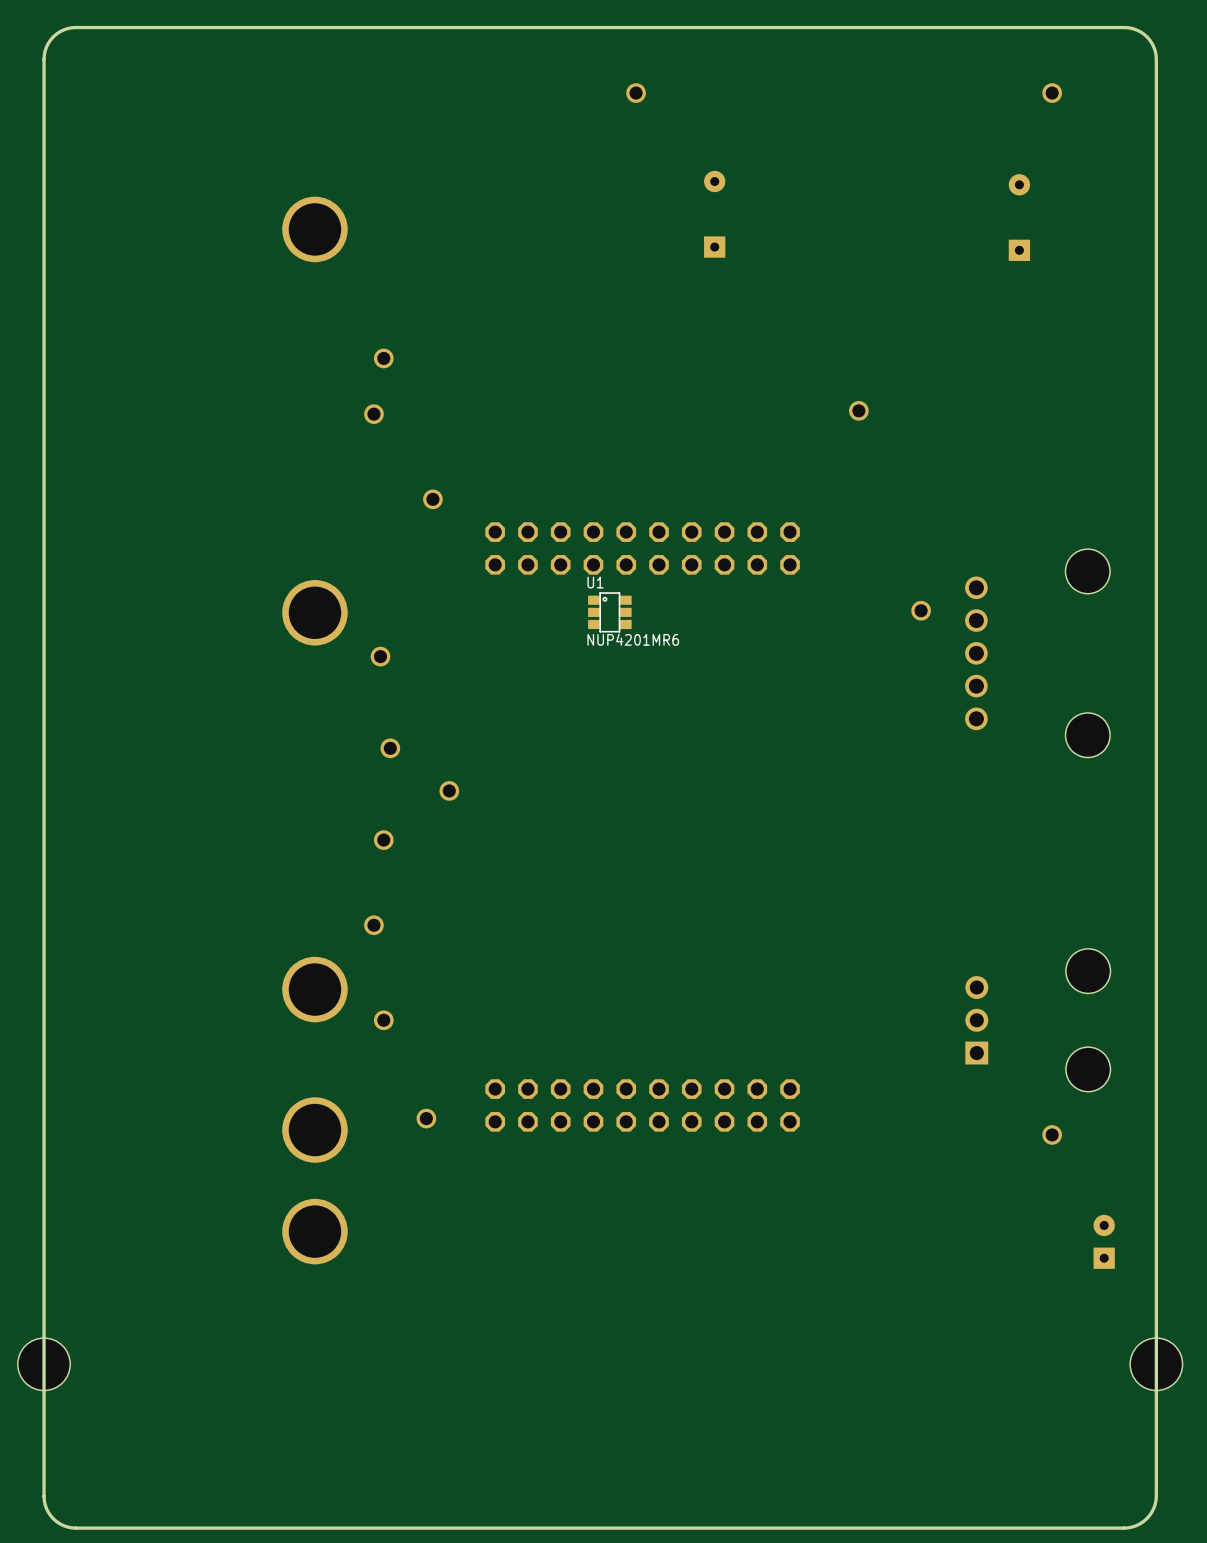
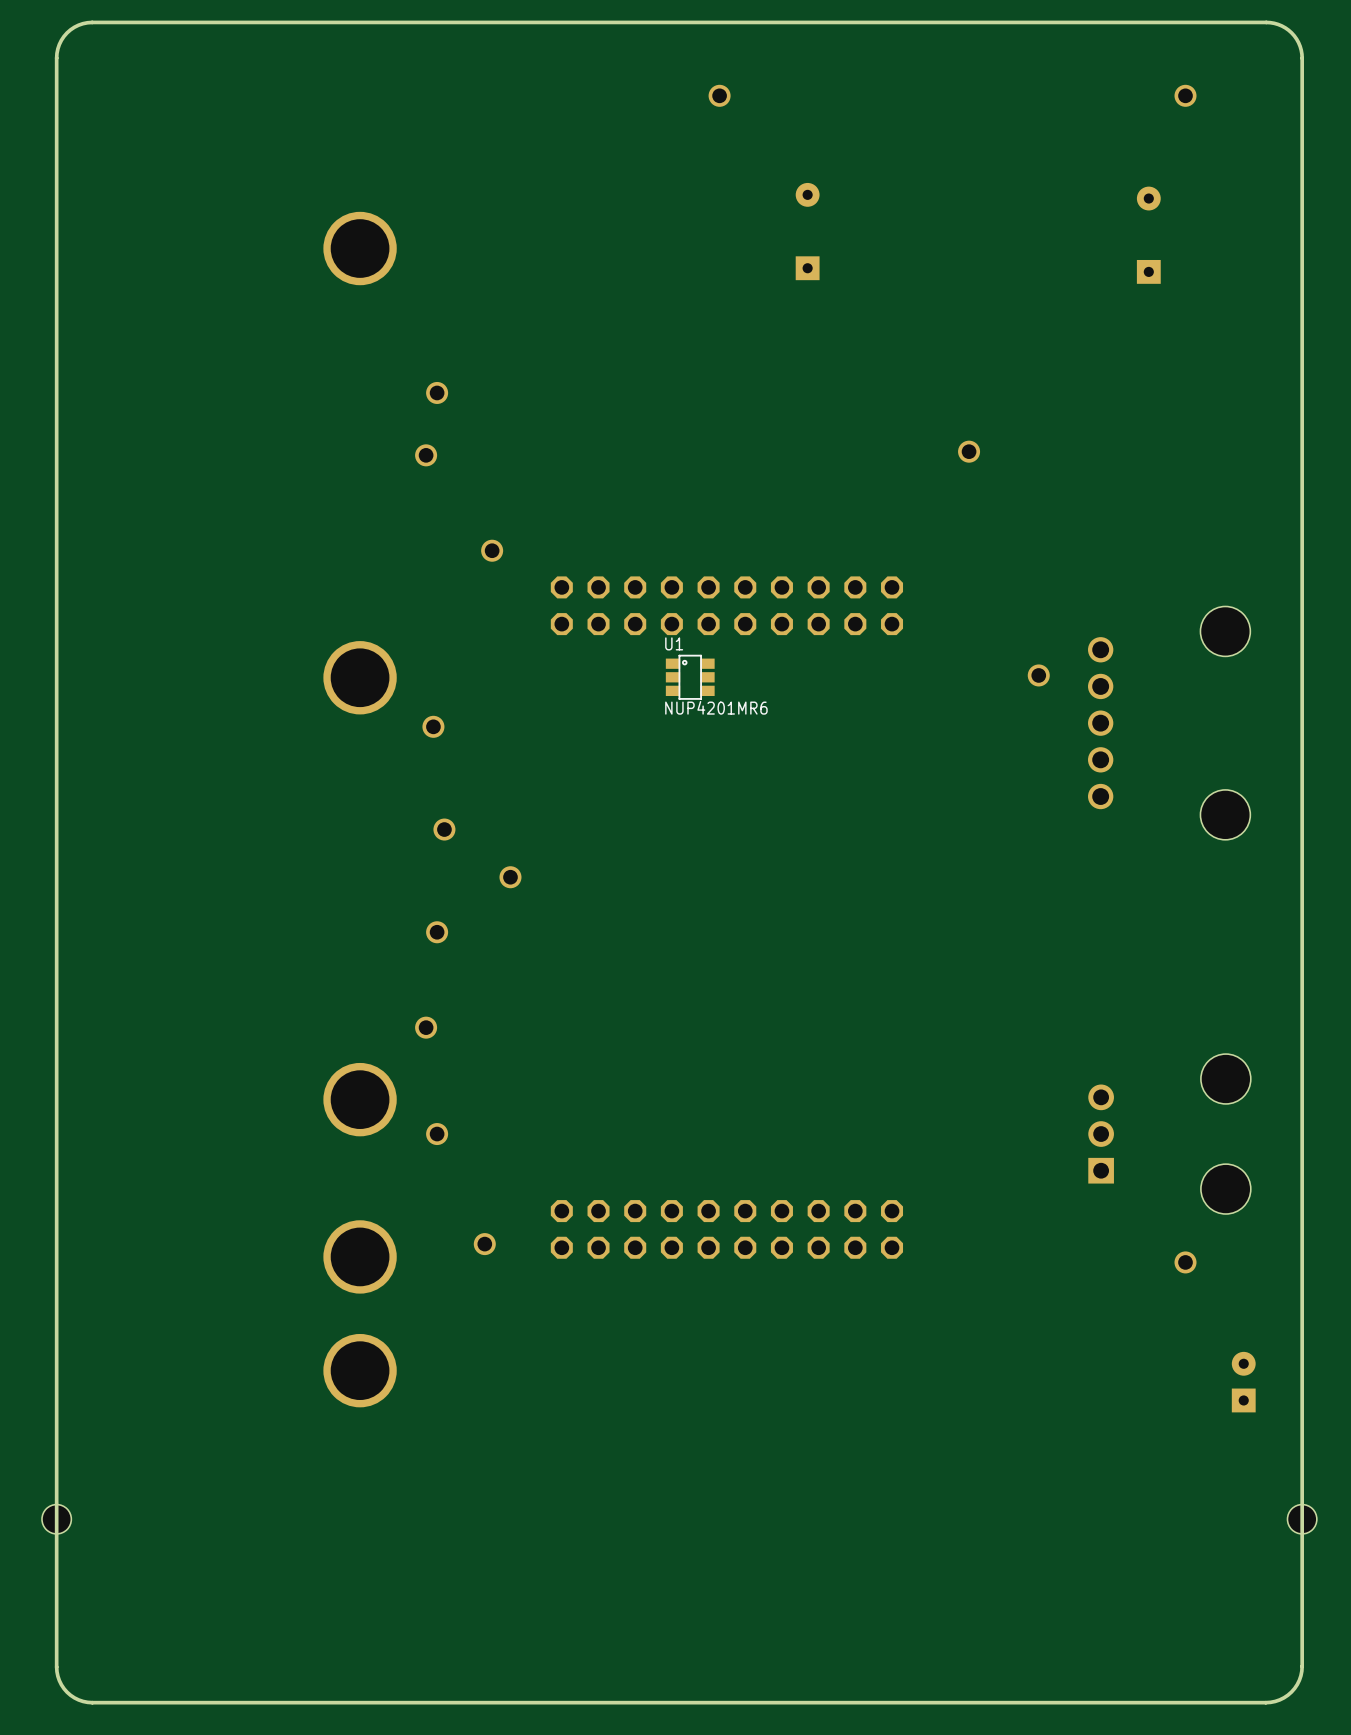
hole size: [17, 1338, 71, 1391] -> [41, 1504, 72, 1534]
hole size: [1130, 1338, 1183, 1391] -> [1287, 1504, 1317, 1534]

